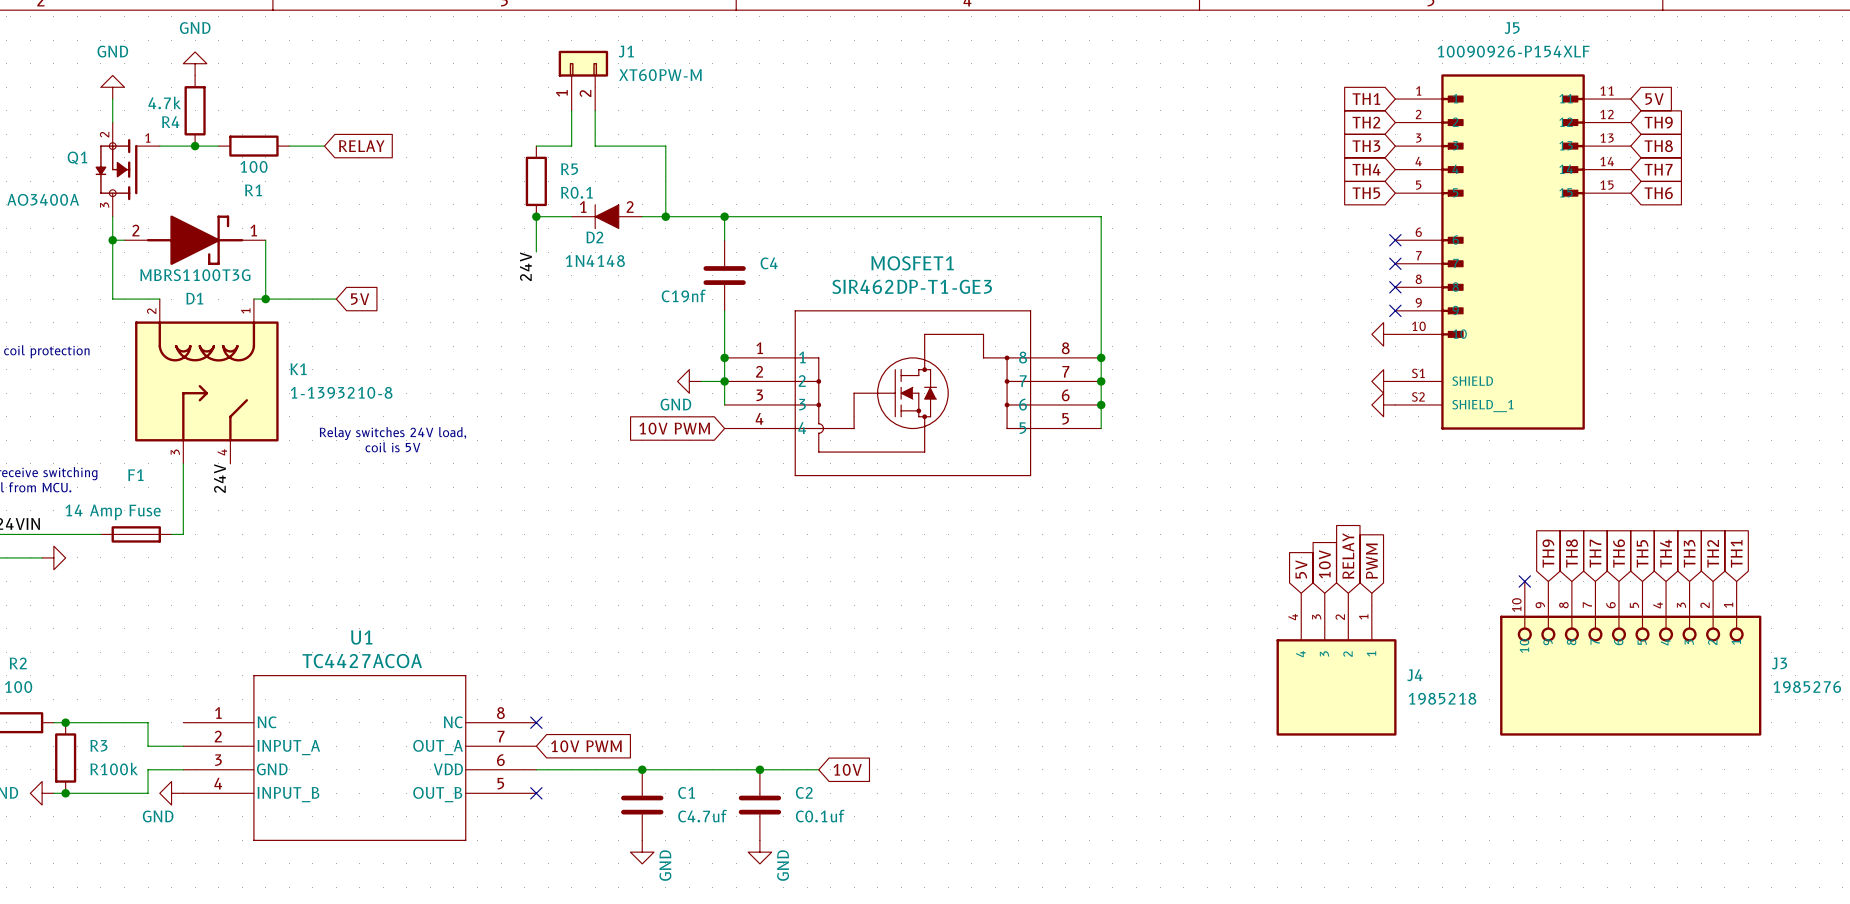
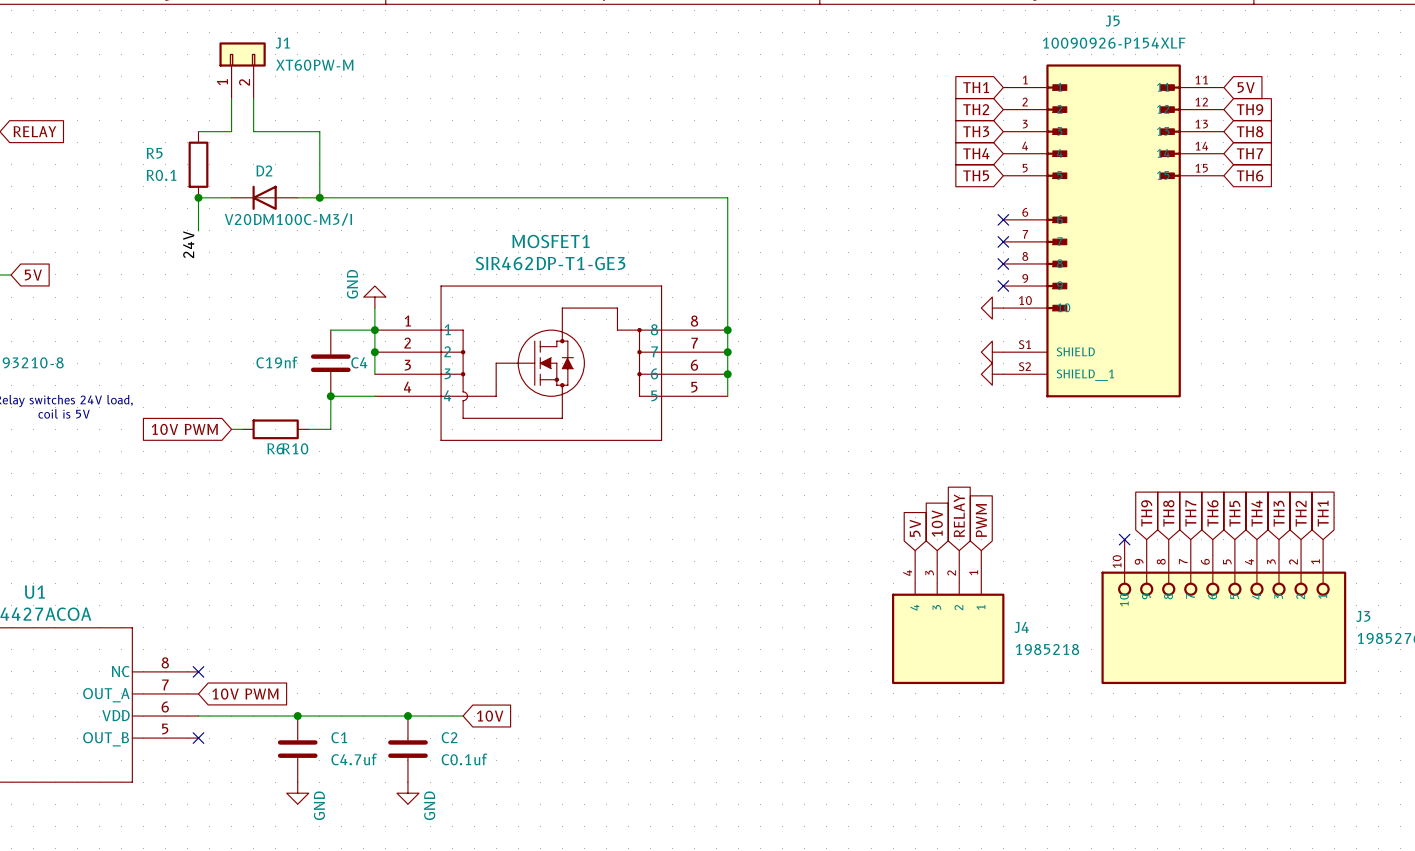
R5 name position: R5 (569, 169) -> R5 (154, 153)
R5 value position: R0.1 (576, 192) -> R0.1 (161, 175)
D2 symbol: [571, 204, 643, 229] -> [231, 185, 298, 210]
wire: (724, 216) (724, 240) -> none
junction: (724, 216) -> none
D2 name position: D2 (594, 237) -> D2 (264, 170)
D2 value: 1N4148 (595, 261) -> V20DM100C-M3/I (288, 219)
C4 name position: C4 (769, 263) -> C4 (359, 362)
C4 position: (724, 275) -> (330, 363)
C4 value position: C19nf (683, 295) -> C19nf (277, 362)
wire: none -> (330, 330) (374, 330)
power symbol rotation: 0° (689, 381) -> 90° clockwise (374, 297)
power symbol position: GND (689, 381) -> GND (374, 297)
wire: (701, 381) (724, 381) -> none
global label position: 10V PWM (674, 428) -> 10V PWM (184, 429)
junction: none -> (330, 396)
wire: none -> (374, 396) (330, 396) (330, 429) (308, 429)
wire: none -> (231, 429) (242, 429)
R6: none -> R10 (275, 429)

